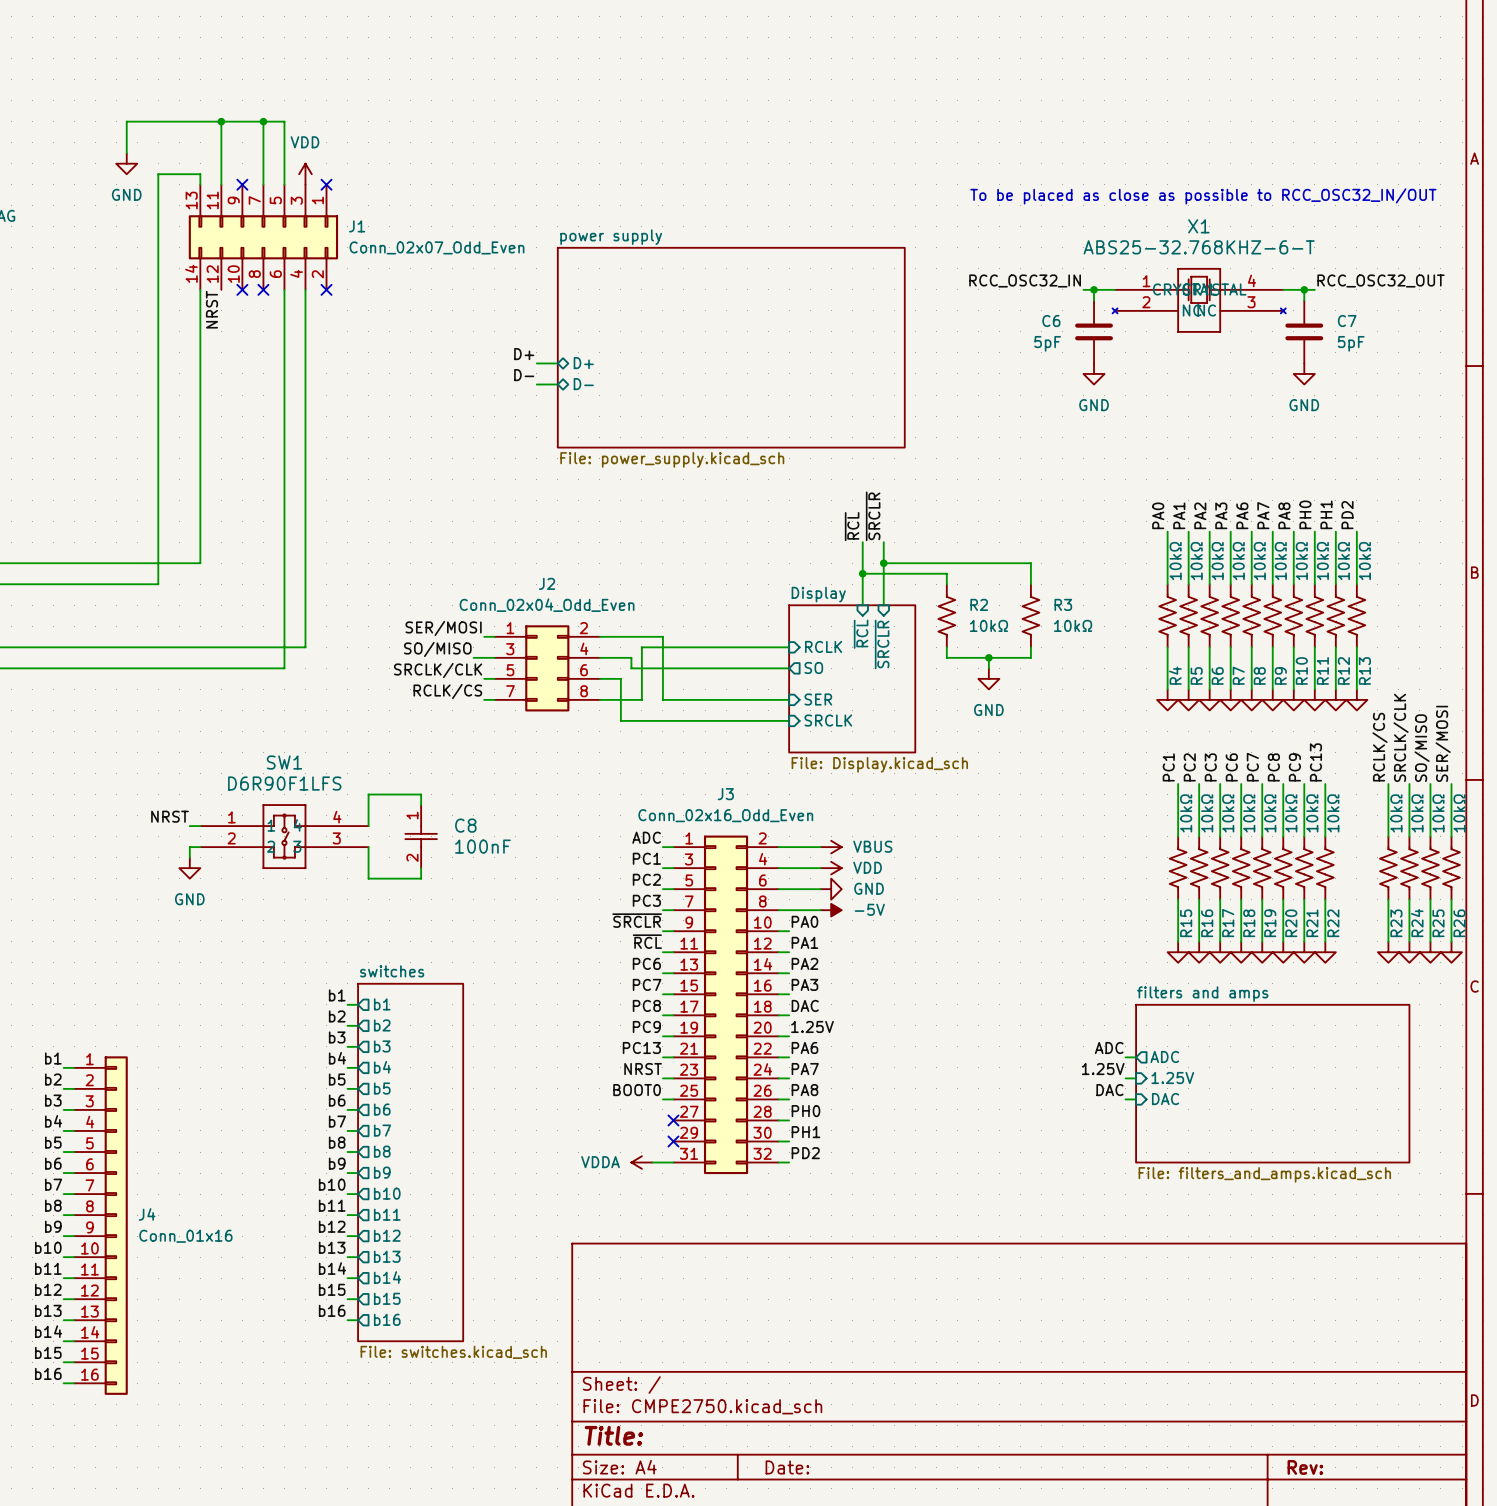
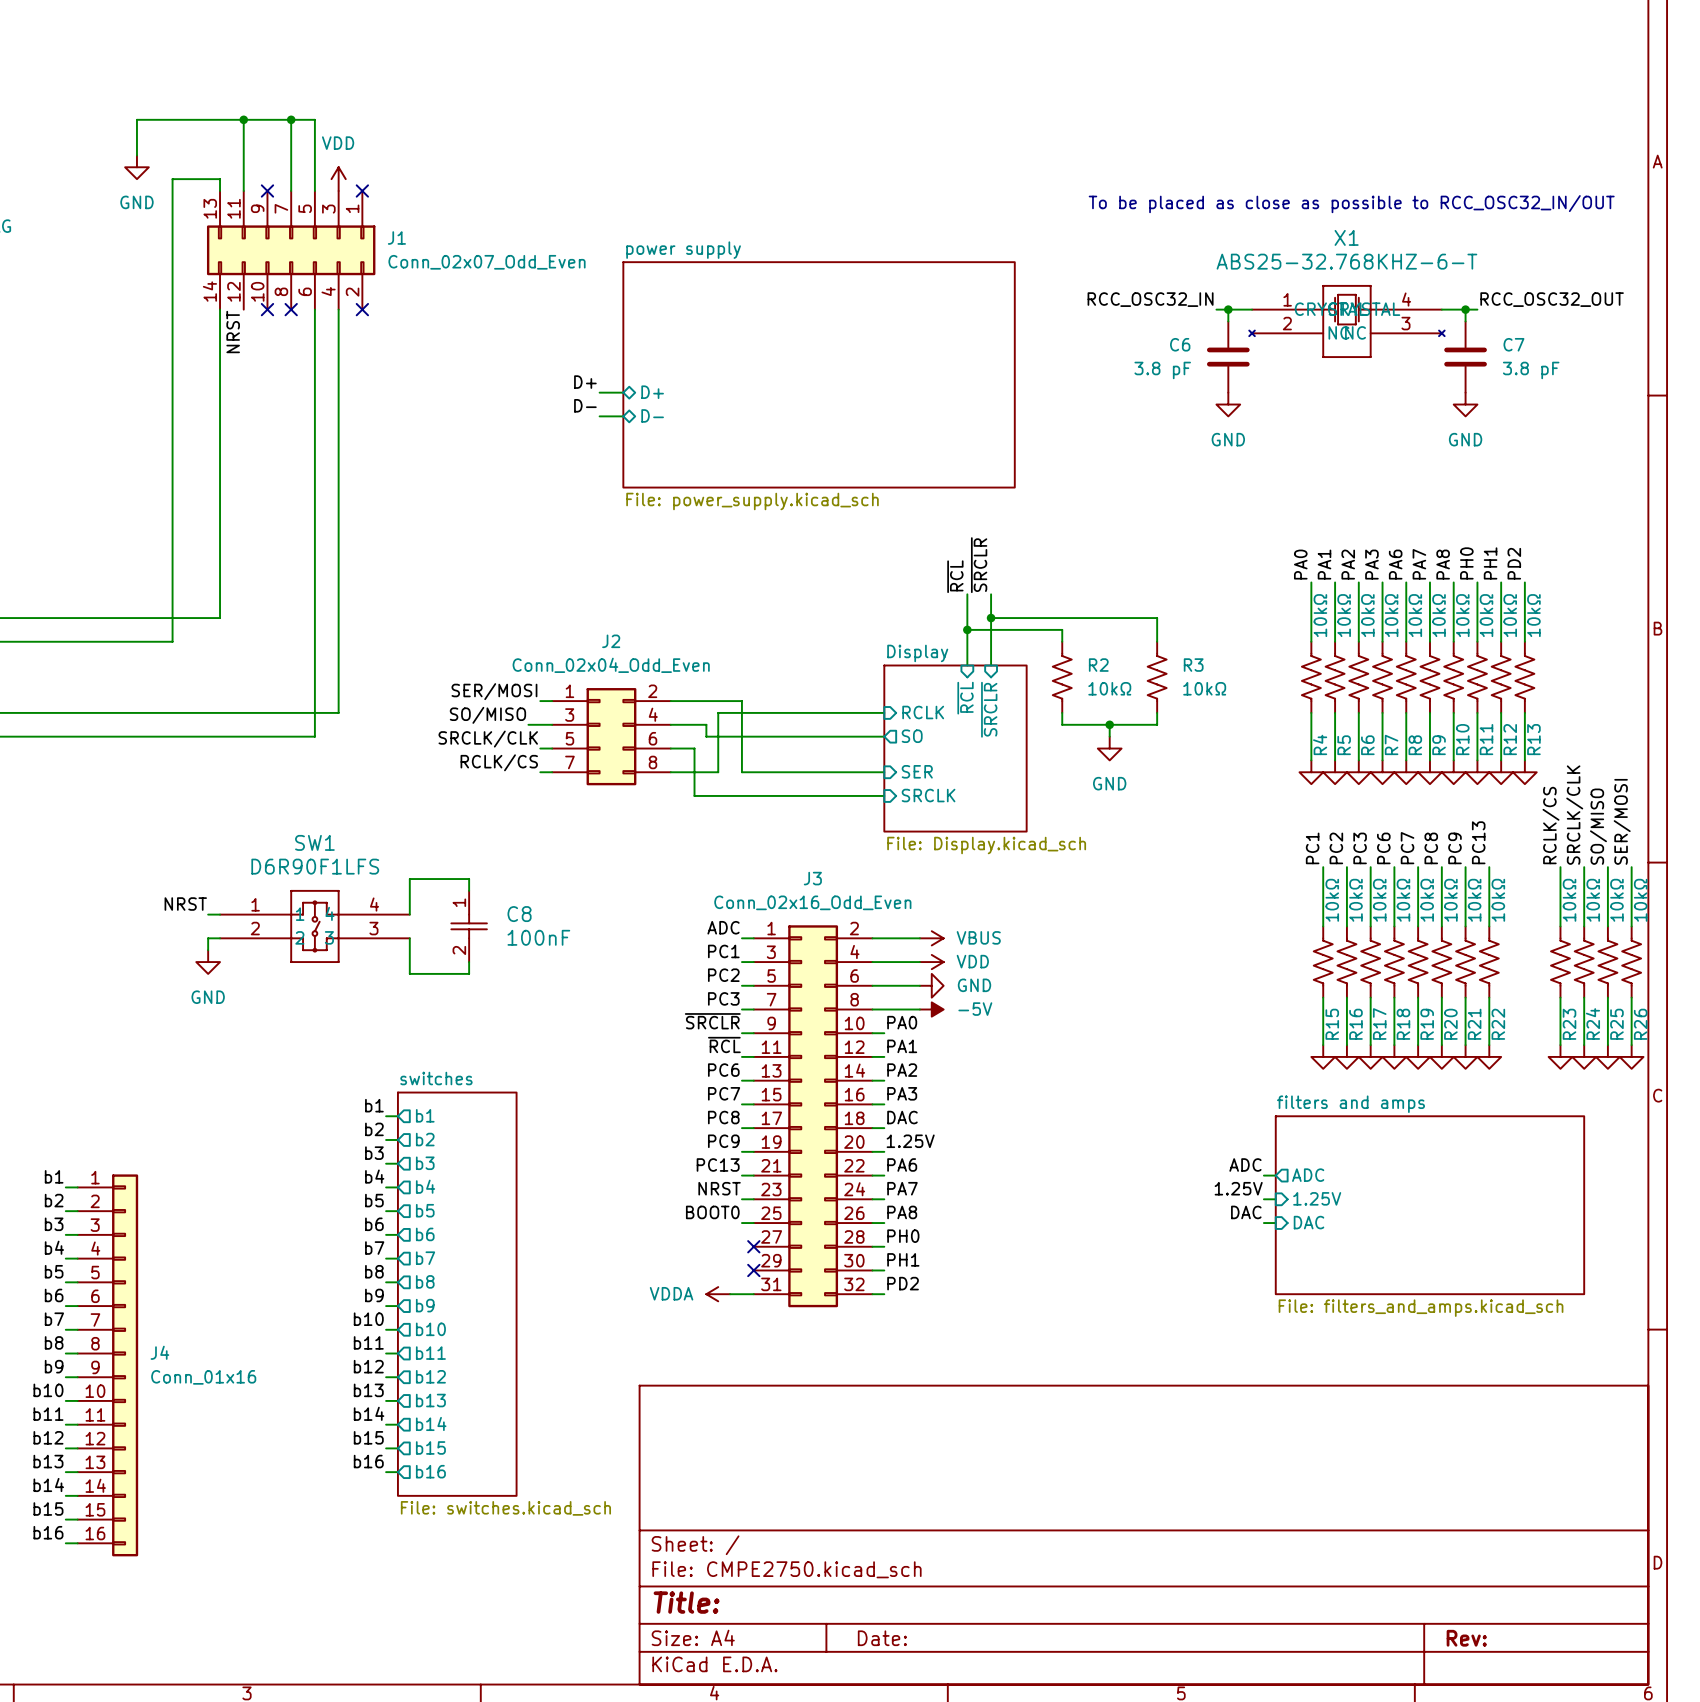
C6 value: 5pF (1047, 343) -> 3.8 pF (1162, 370)
C7 value: 5pF (1351, 343) -> 3.8 pF (1531, 370)

